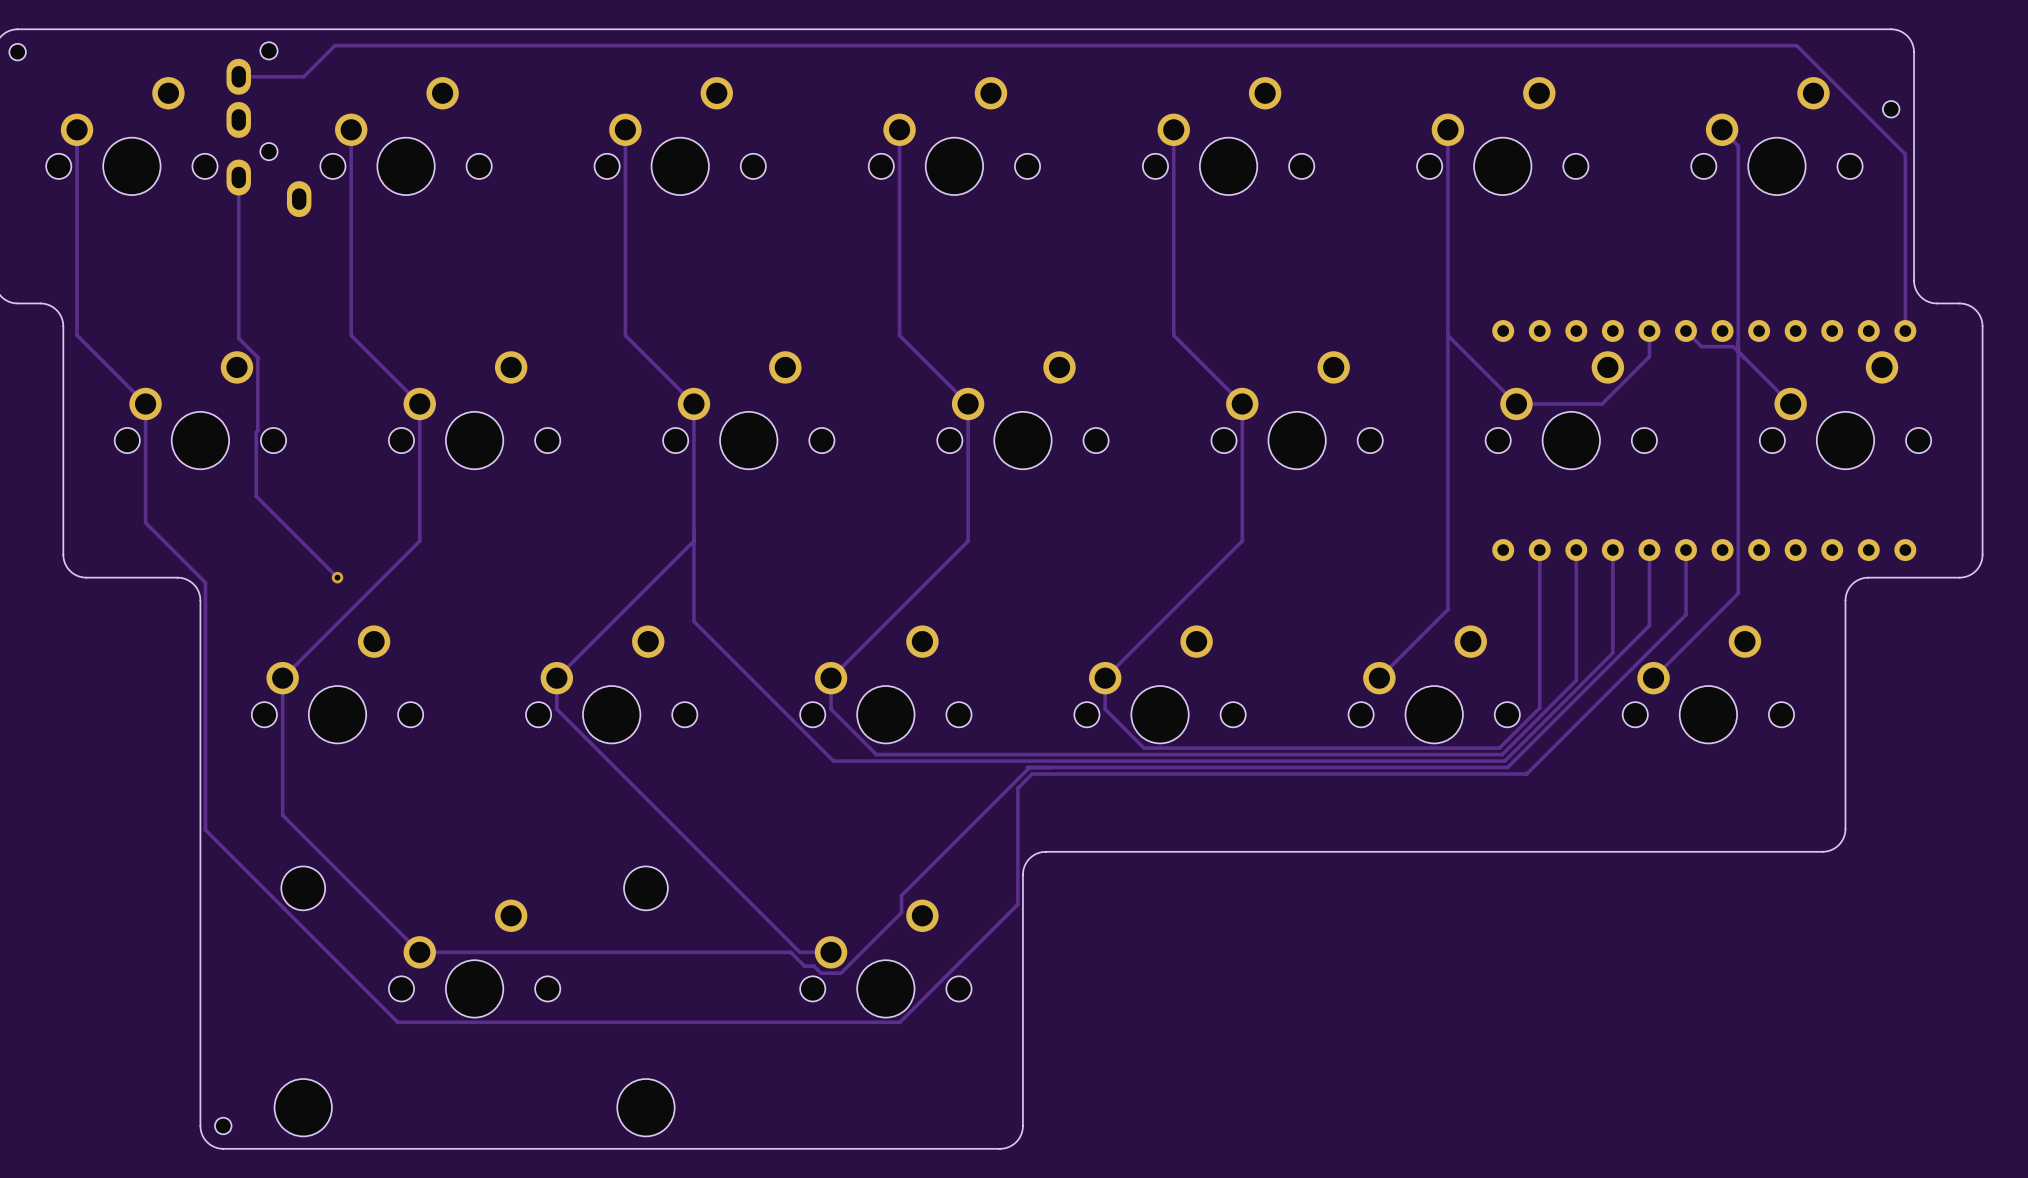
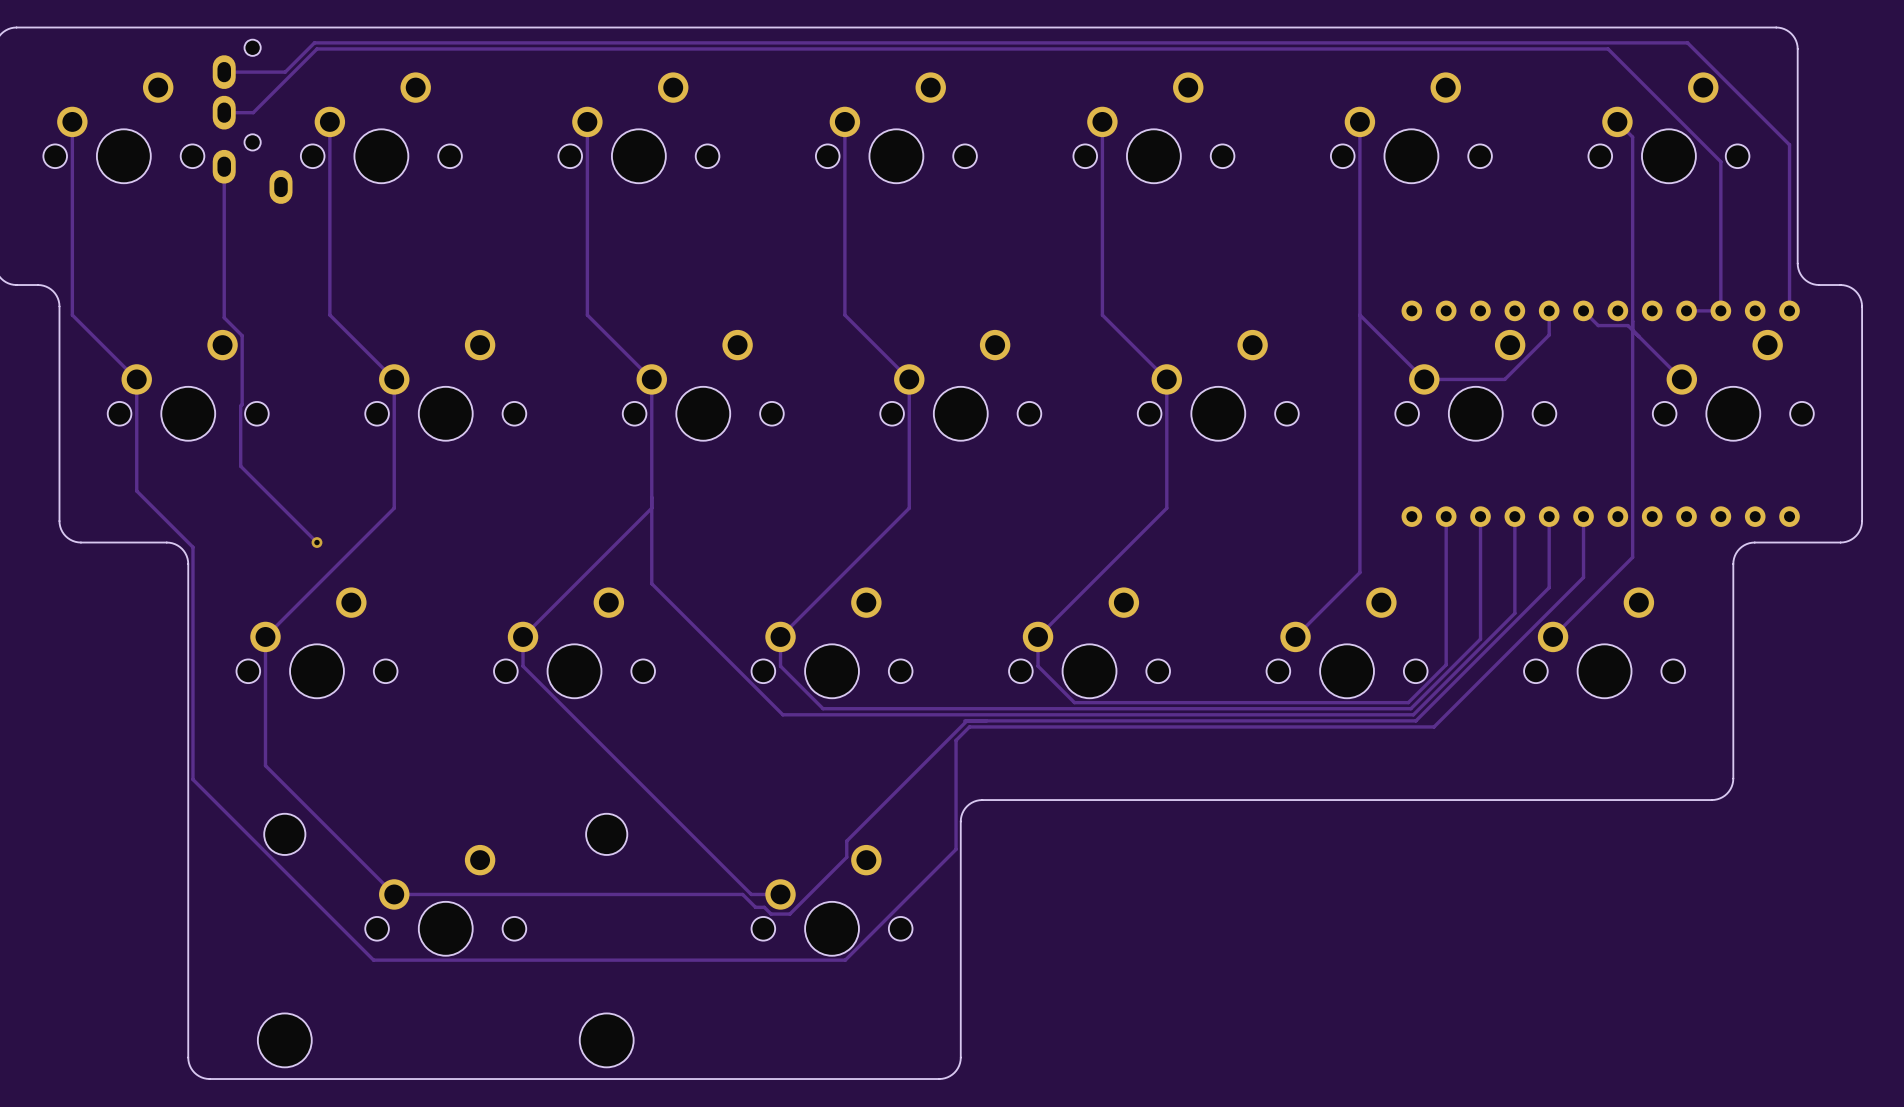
part: (17, 52) -> none
part: (1891, 109) -> none
track: none -> (224, 112) (253, 112) (316, 48) (1608, 48) (1720, 161) (1720, 310) (1686, 310)
part: (223, 1125) -> none

